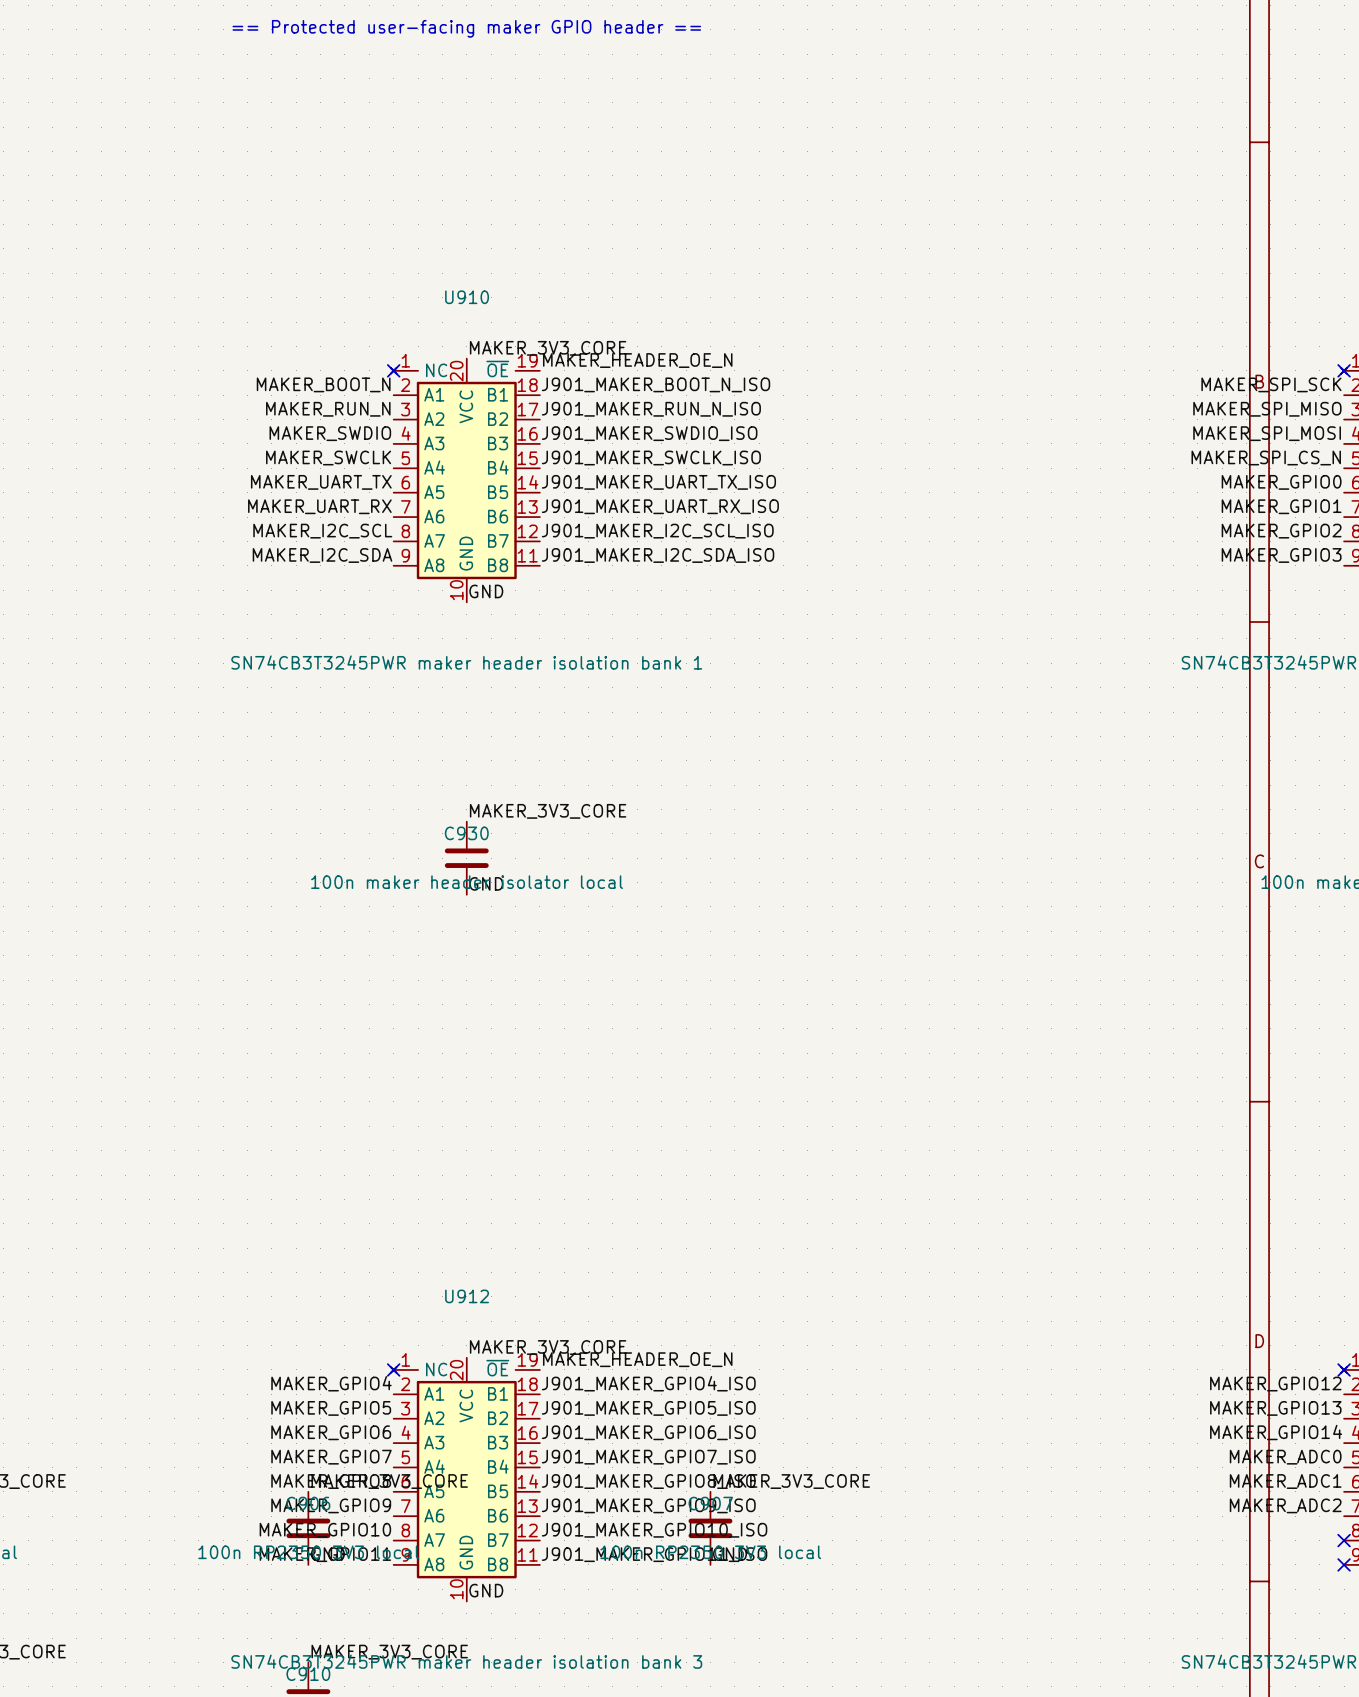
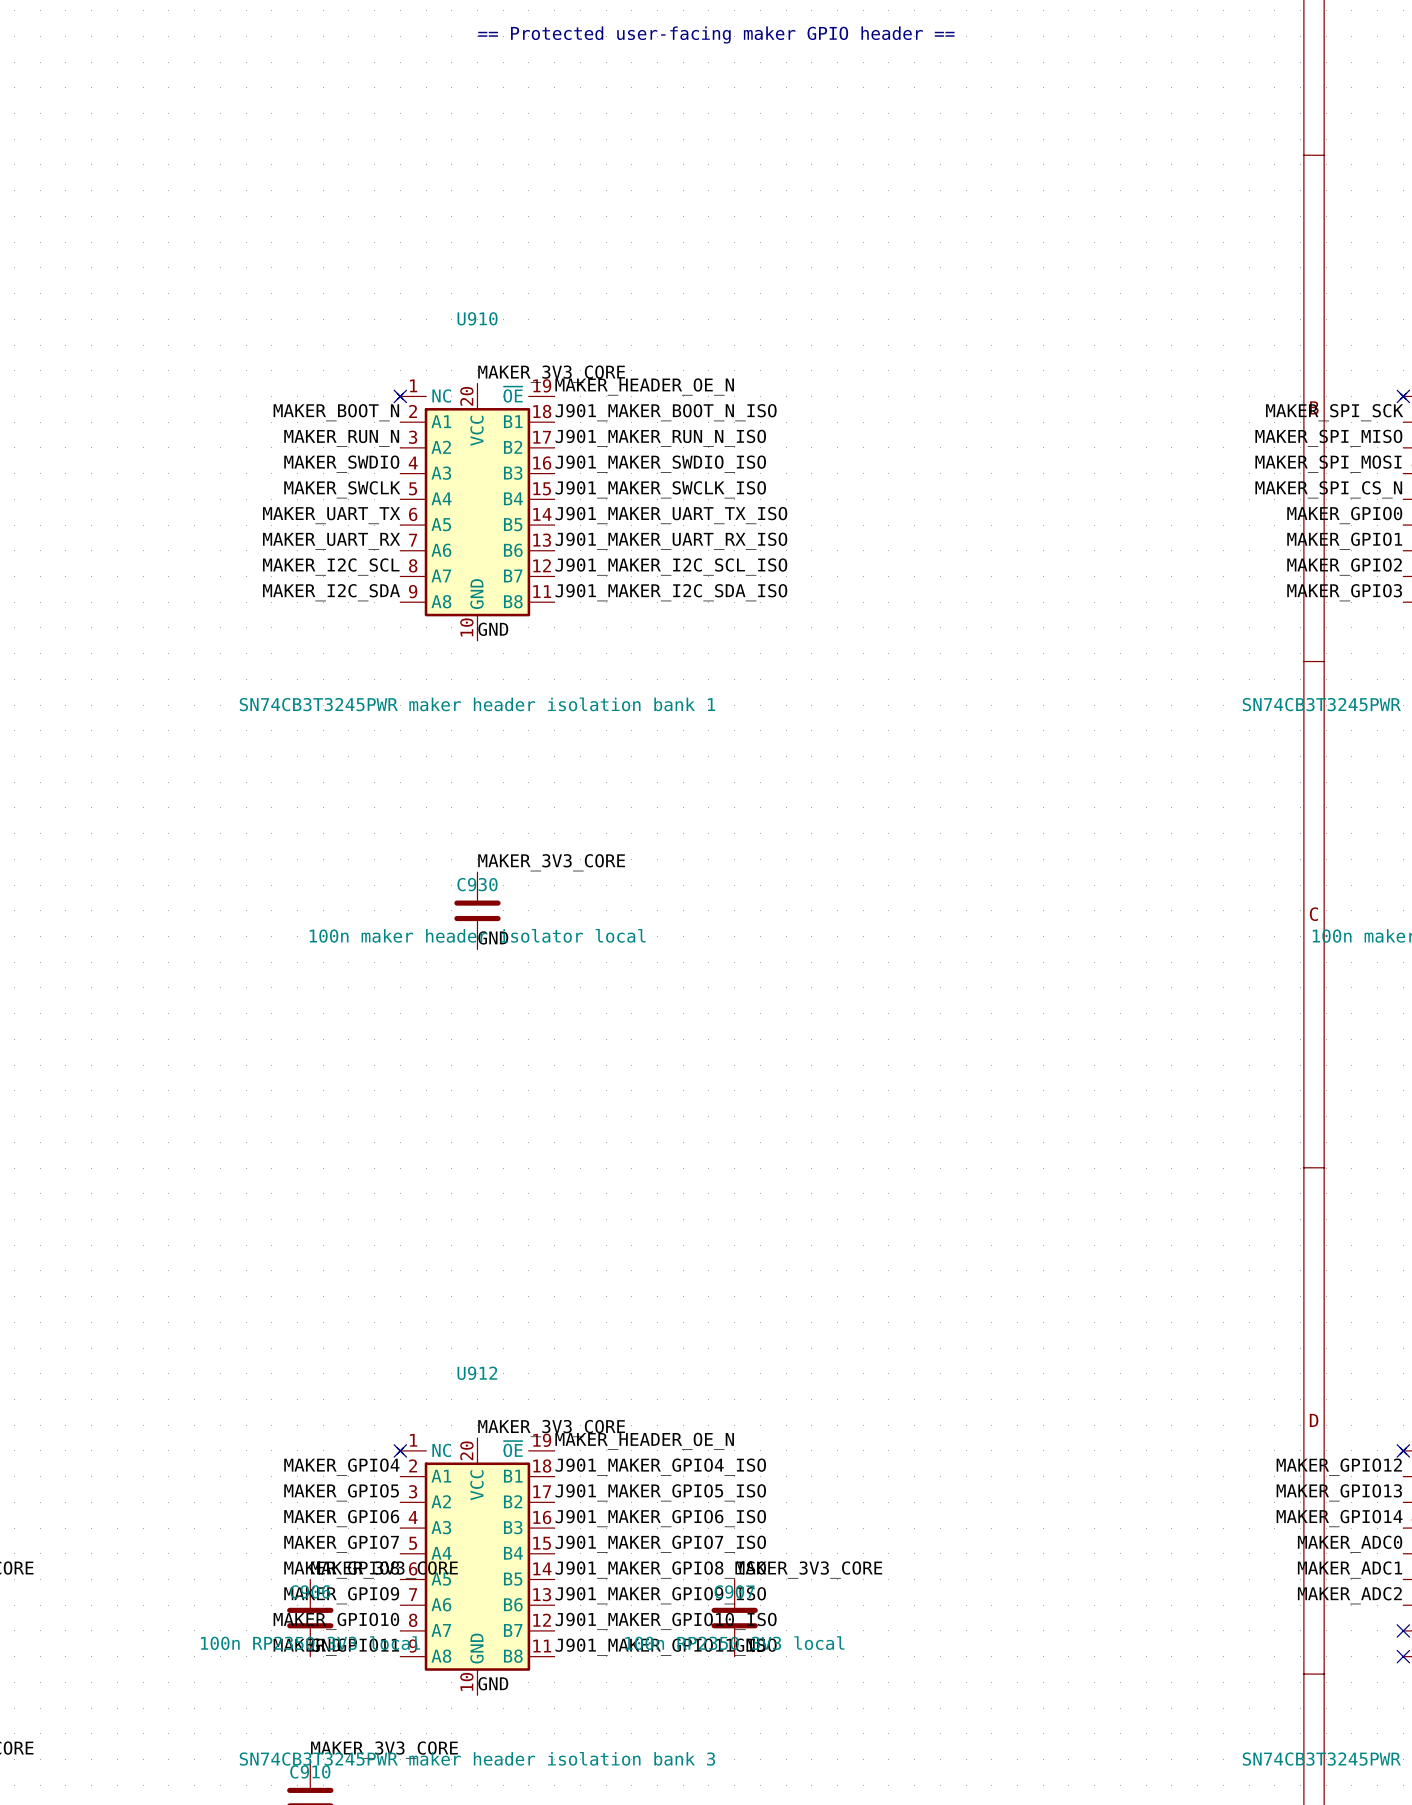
text position: == Protected user-facing maker GPIO header == (466, 28) -> == Protected user-facing maker GPIO header == (716, 34)

